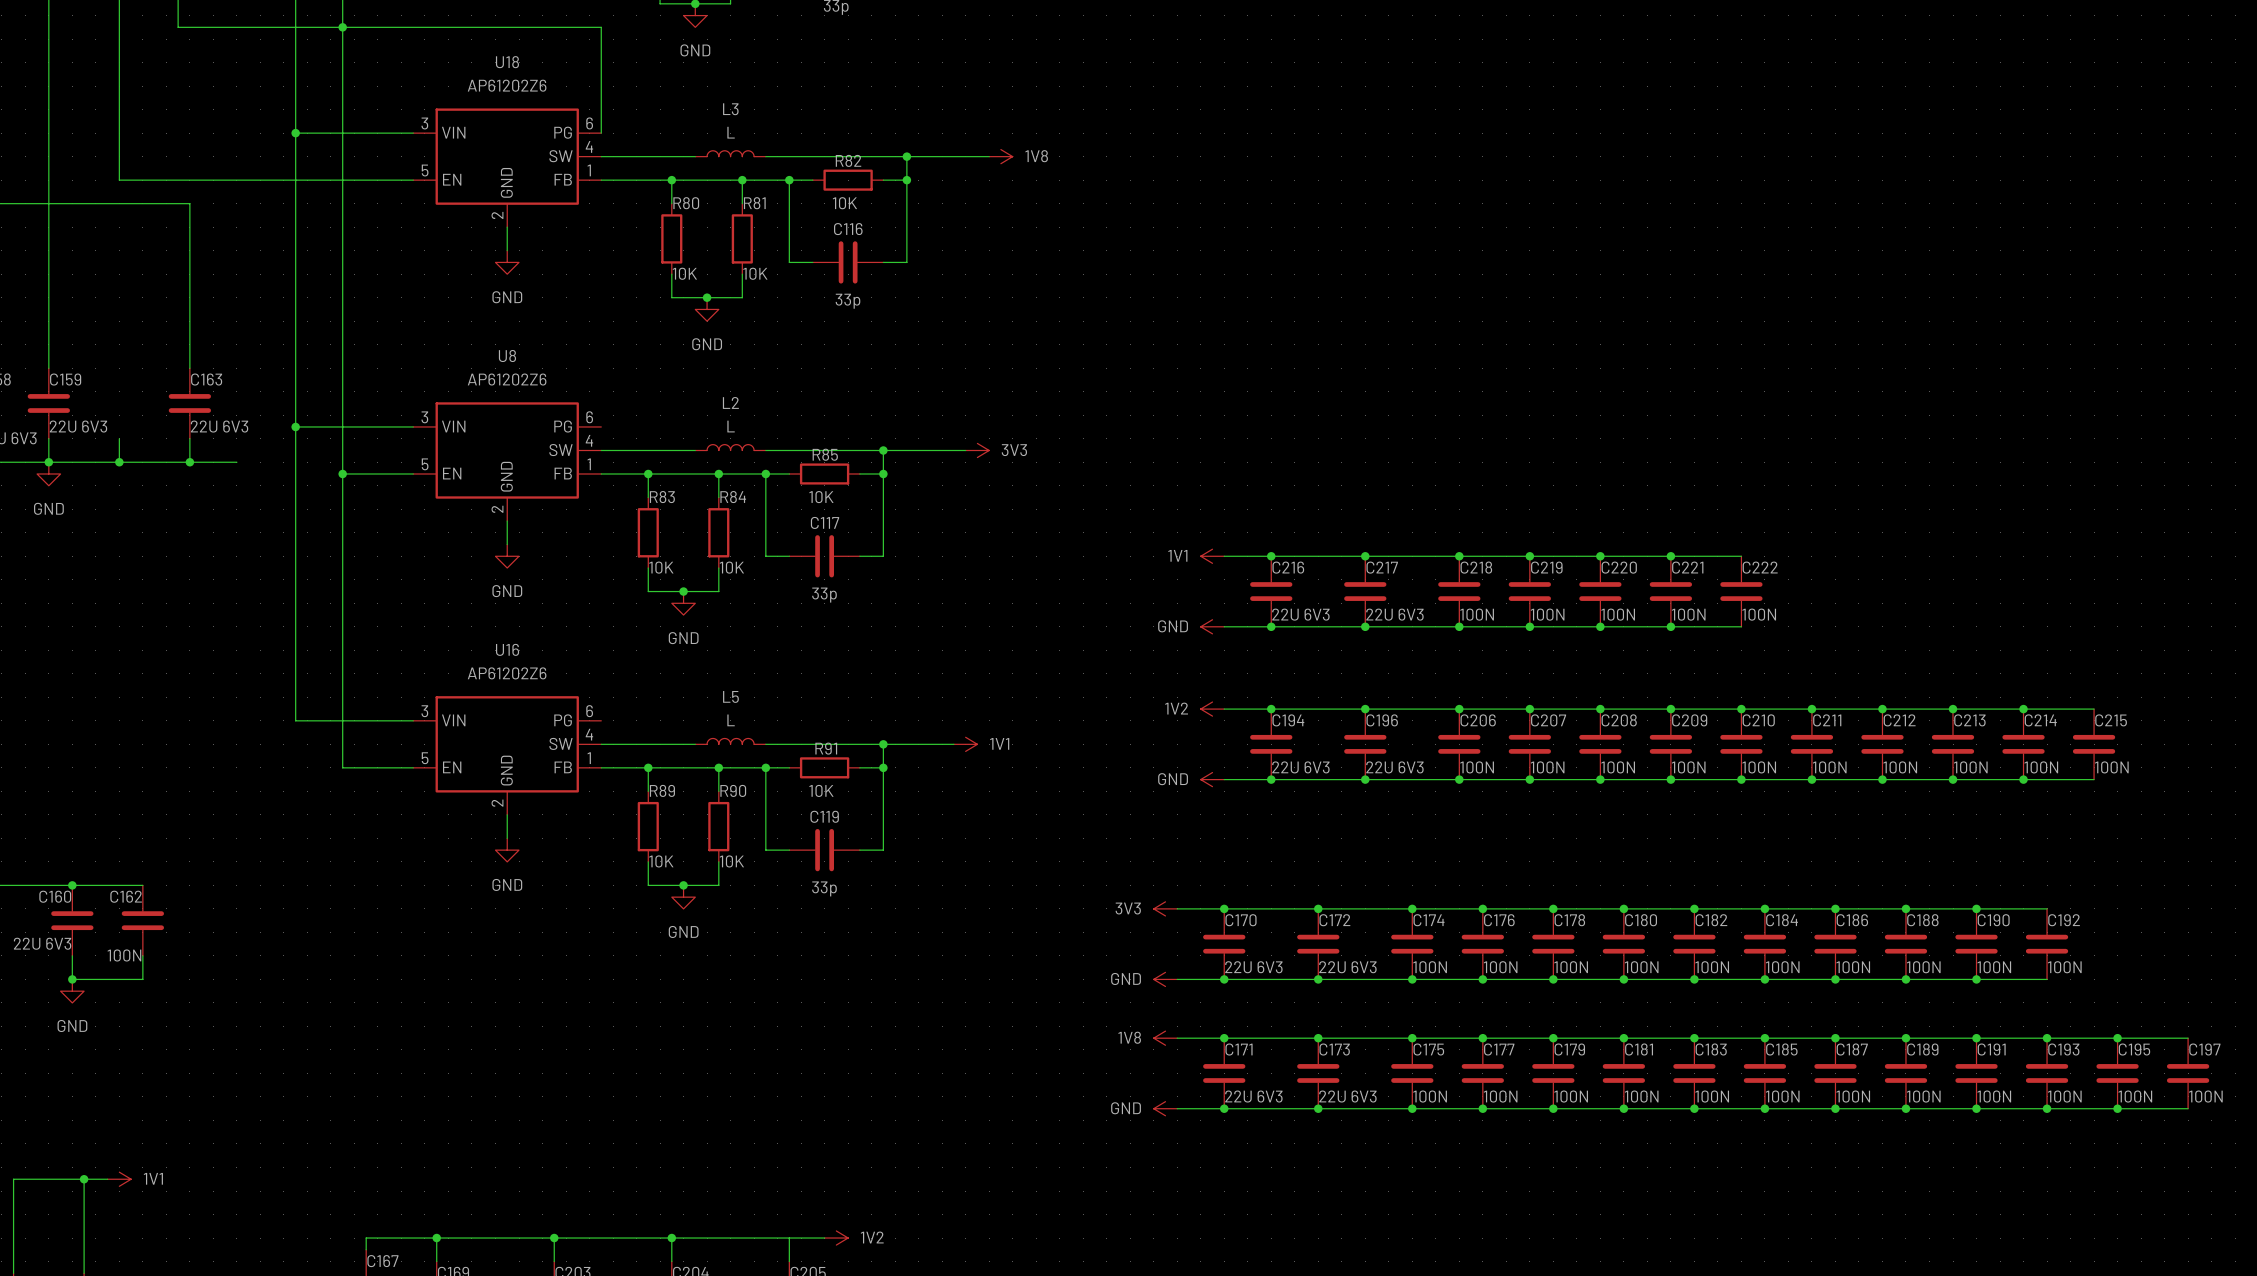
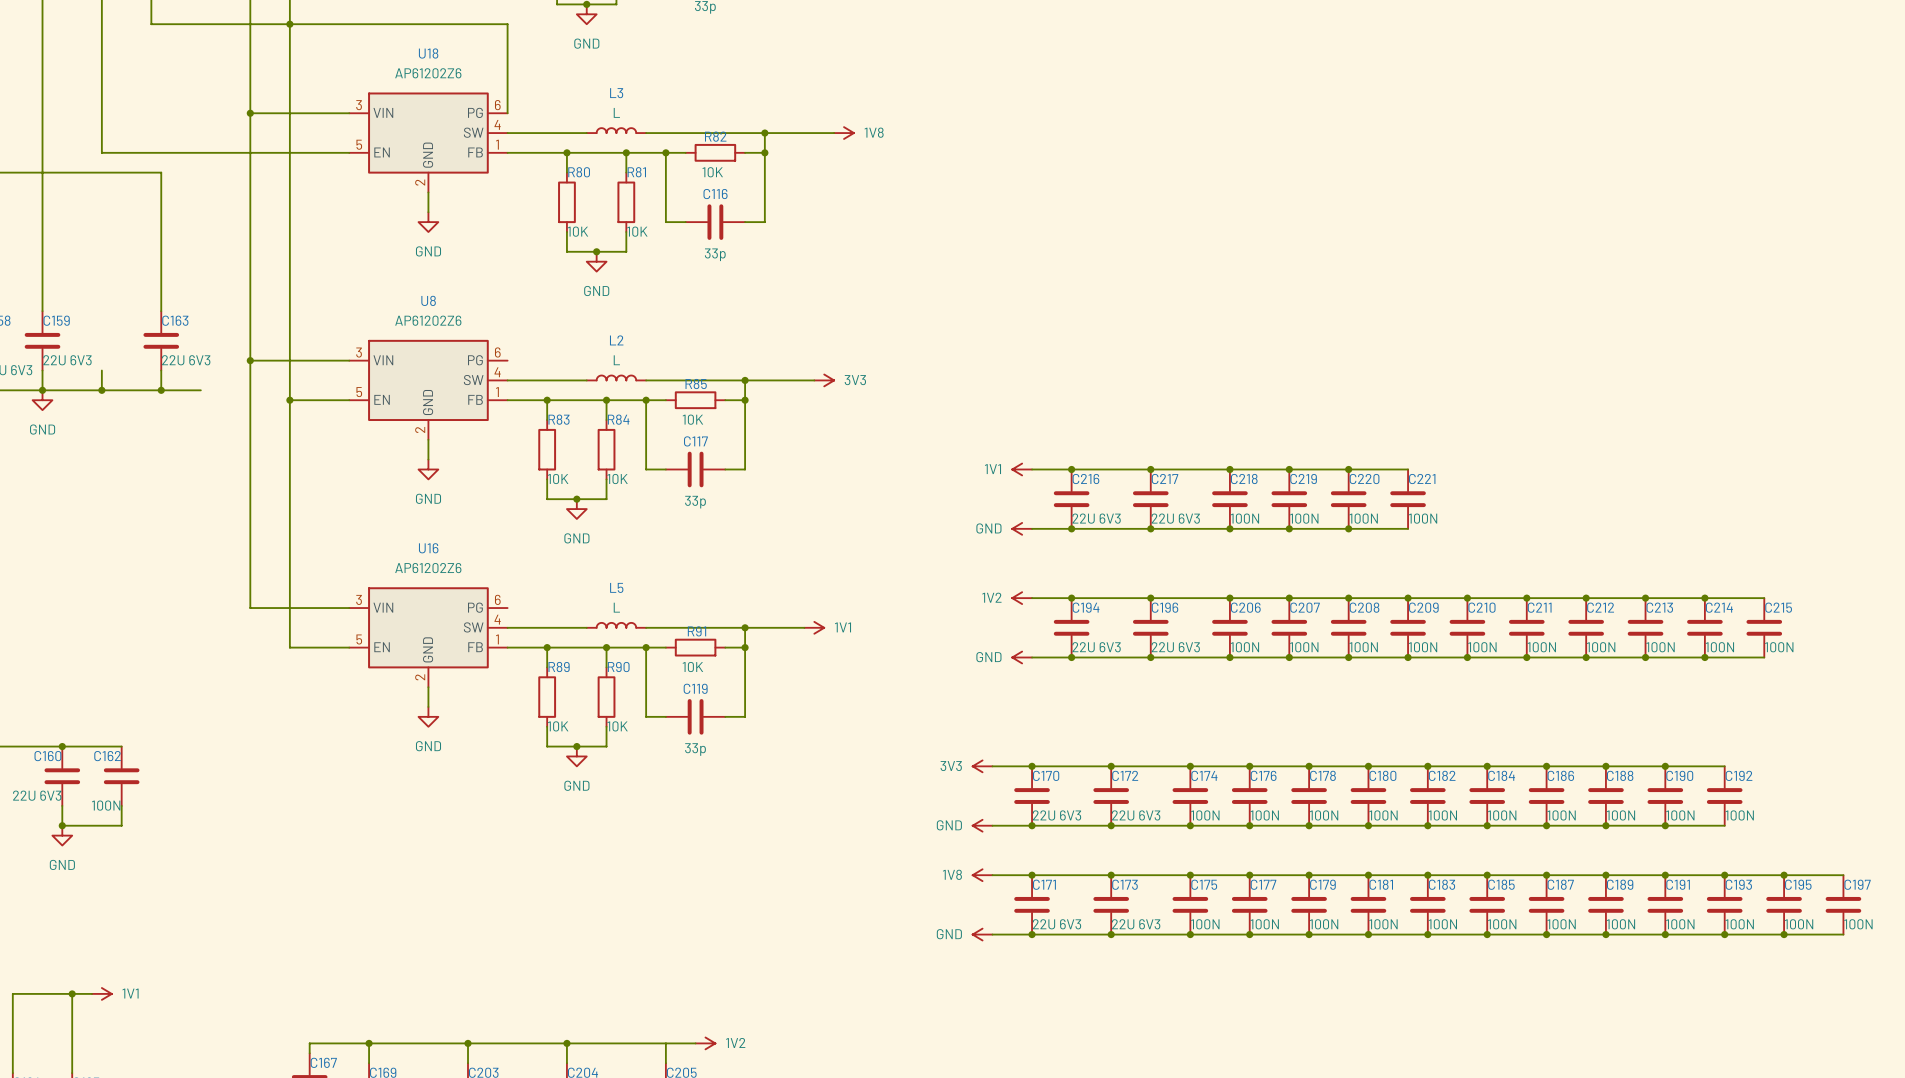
wire: (1670, 556) (1741, 556) -> none
junction: (1670, 556) -> none
C222: 100N (1741, 591) -> none
wire: (1670, 626) (1741, 626) -> none
junction: (1670, 626) -> none

